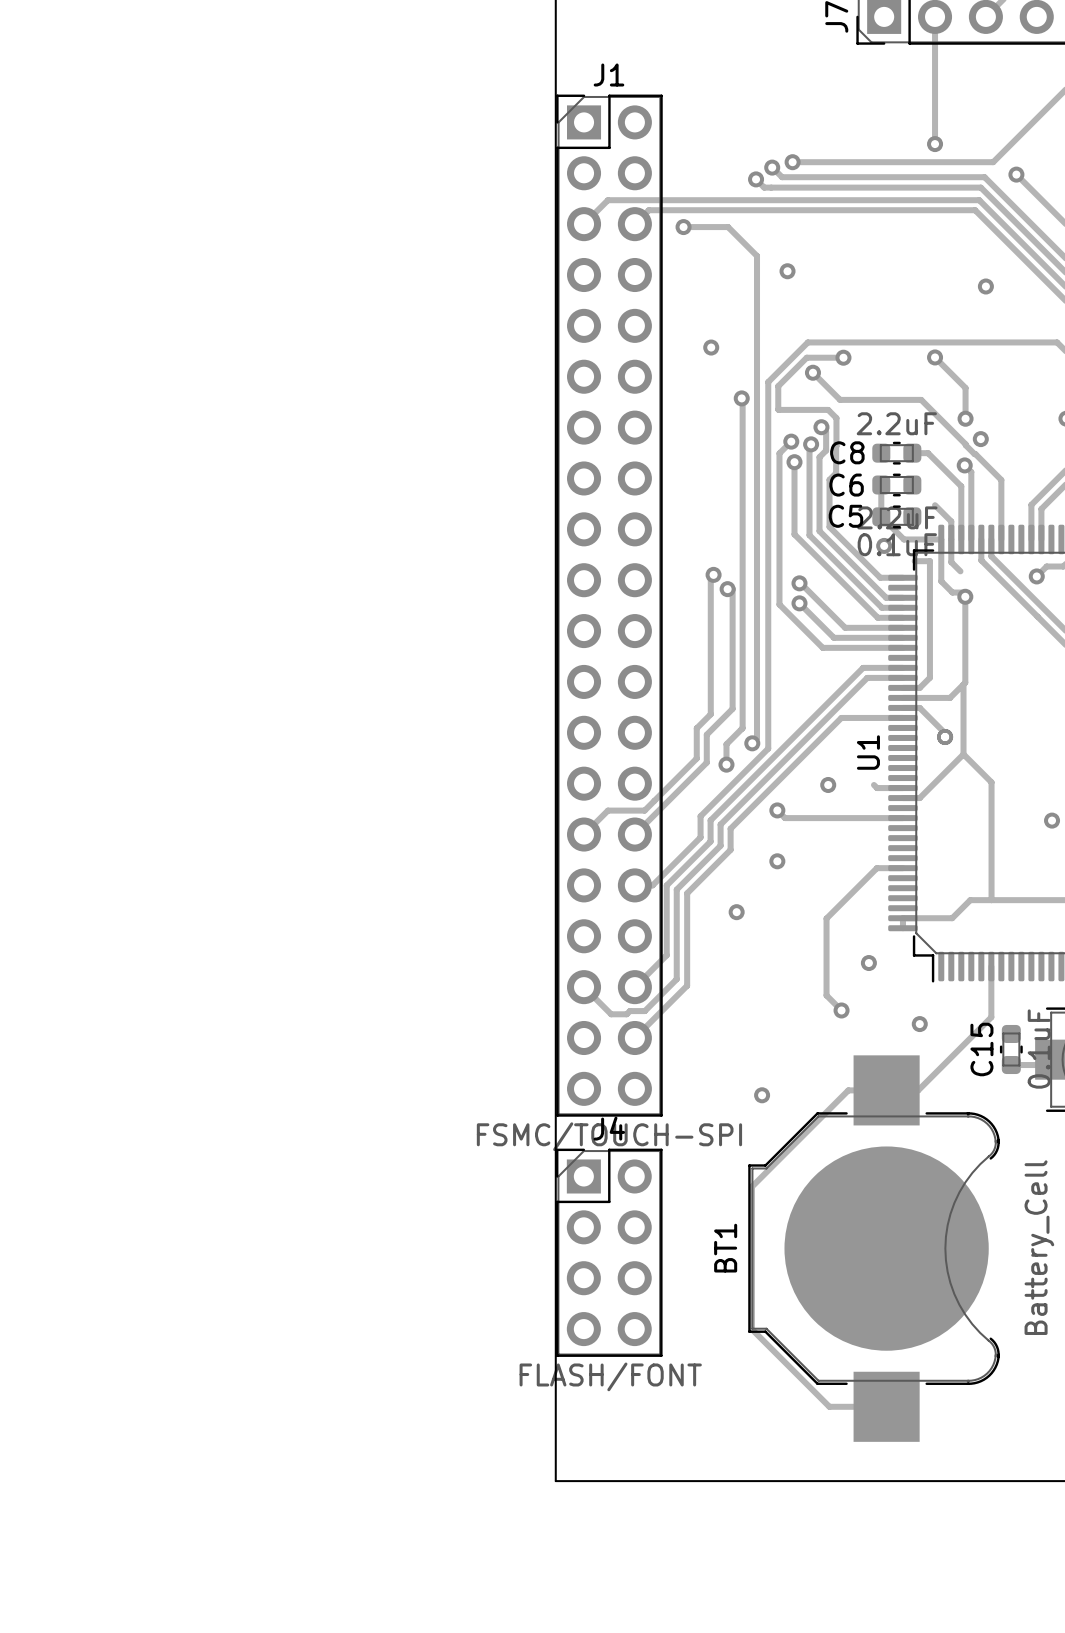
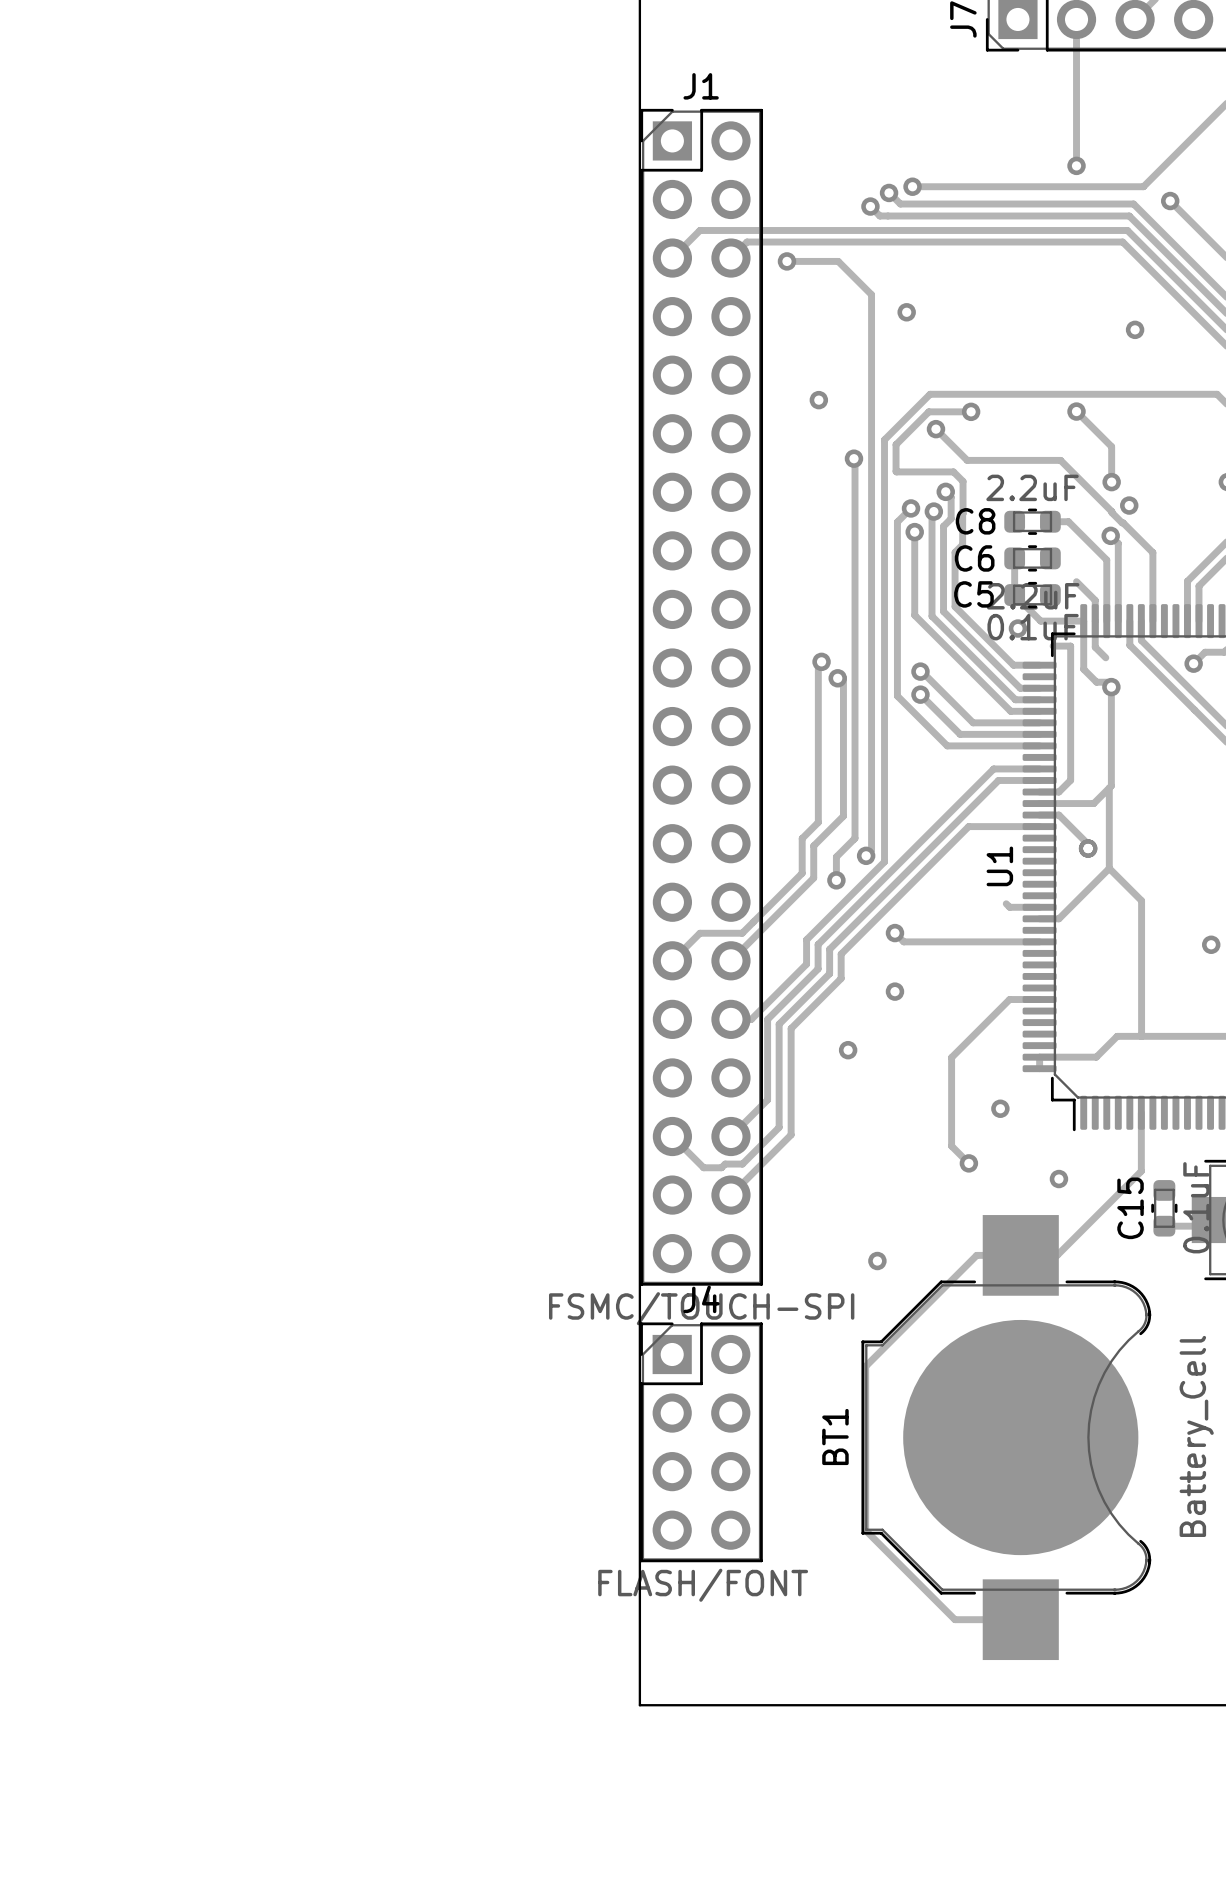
via: (828, 784) -> none

